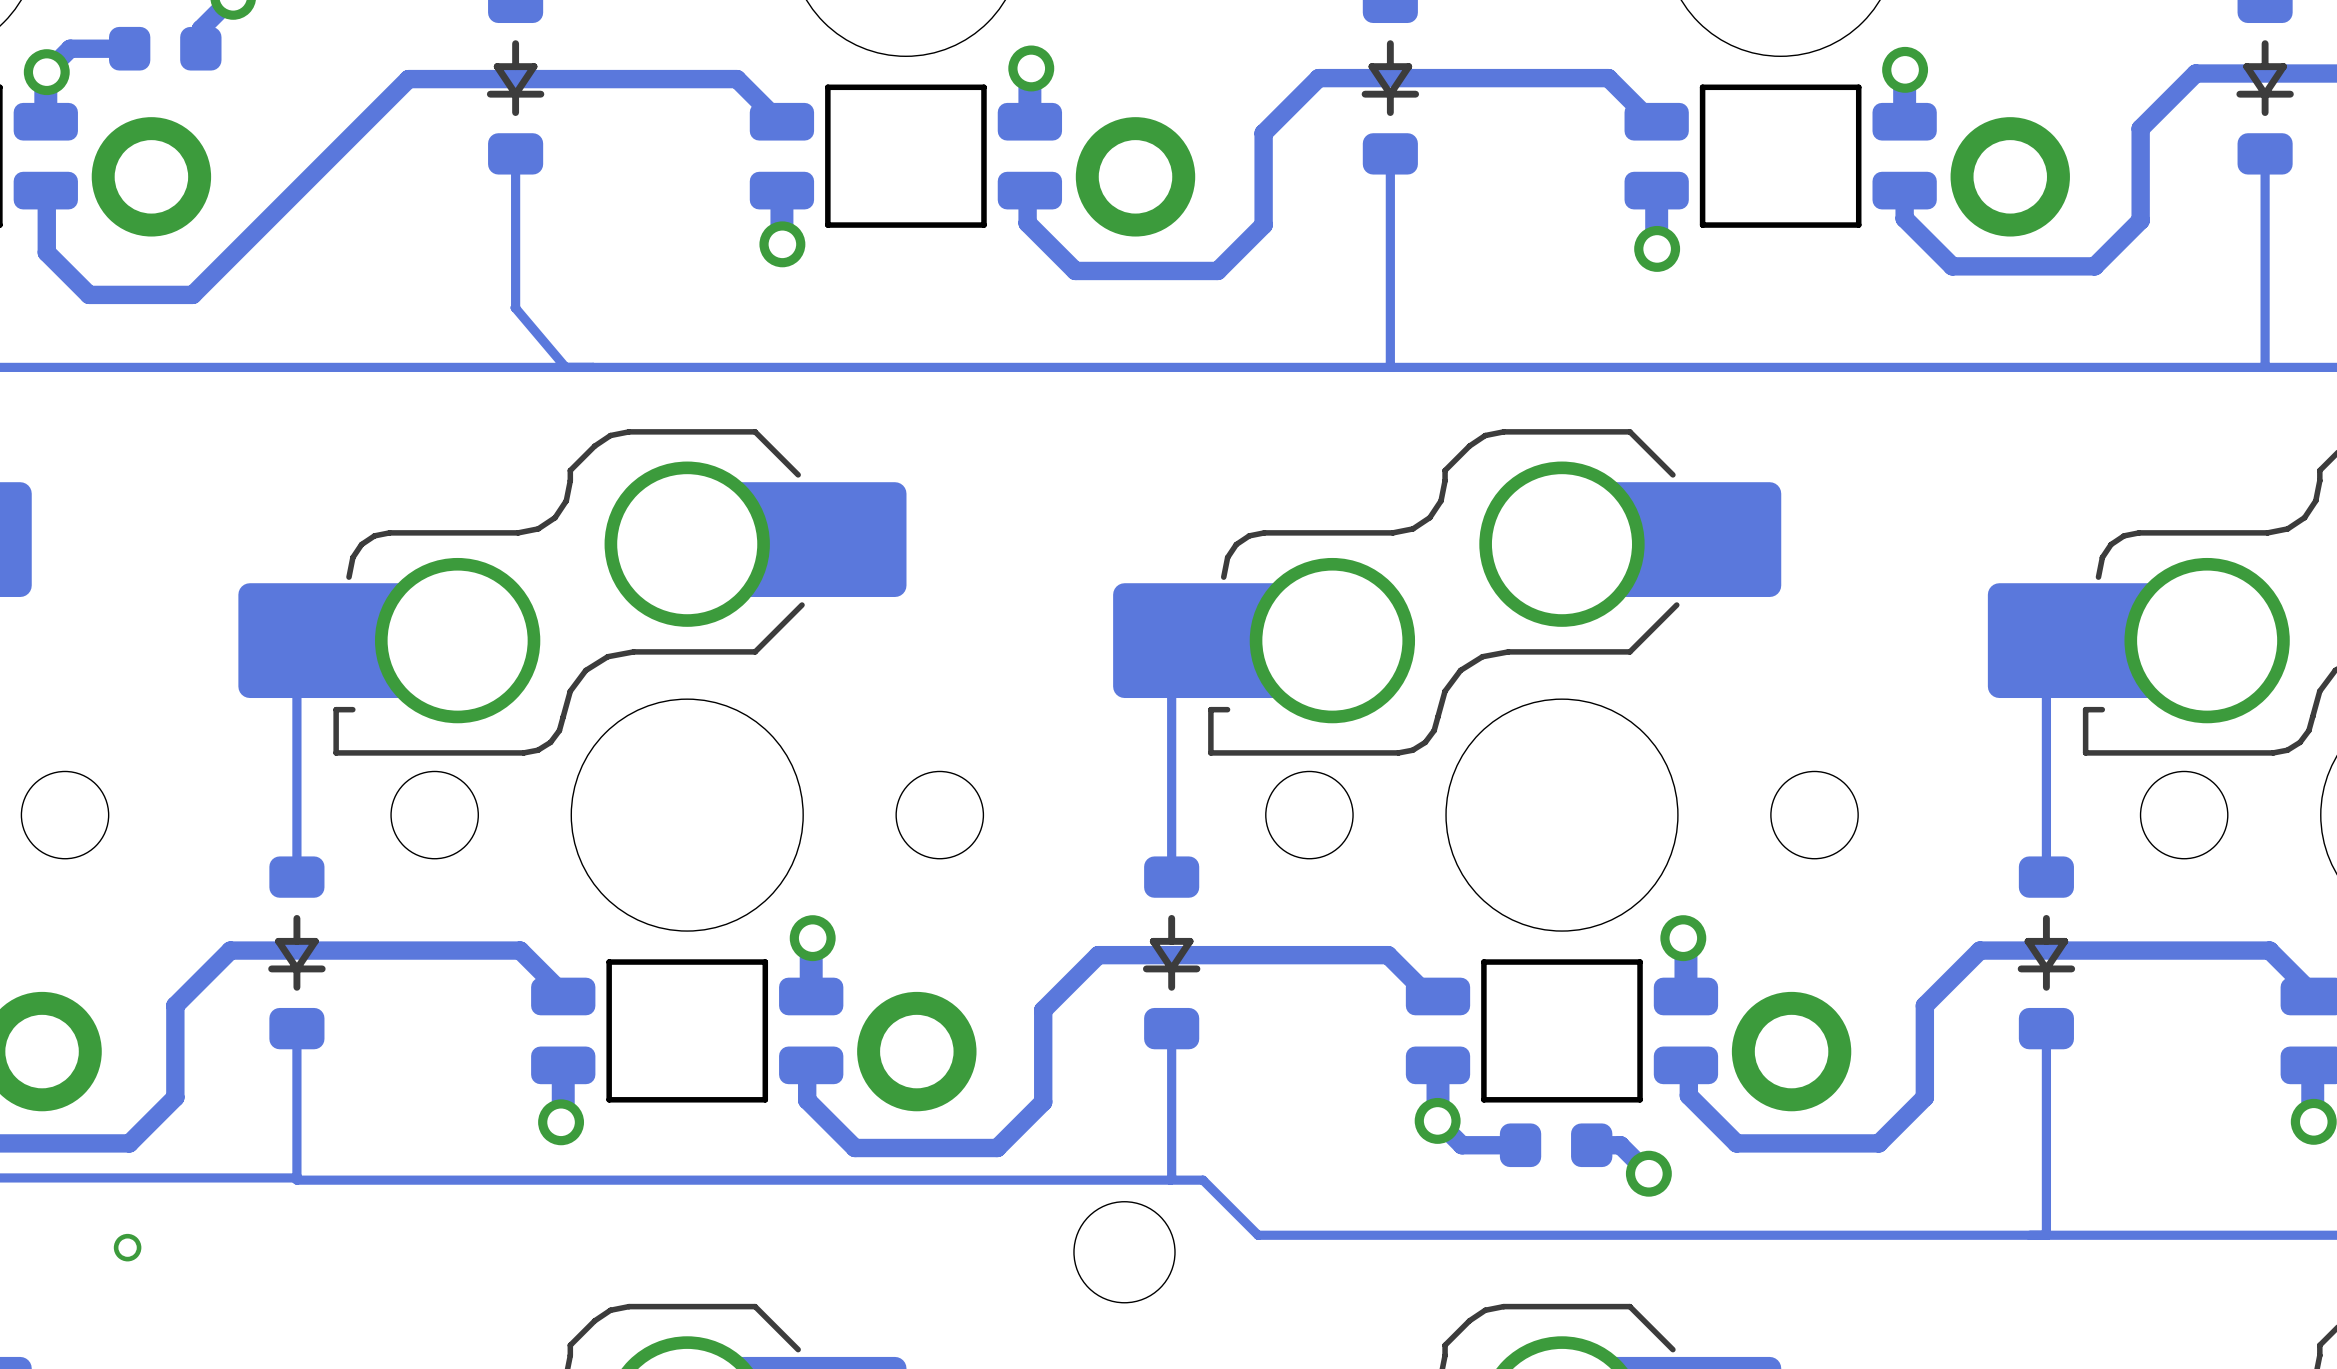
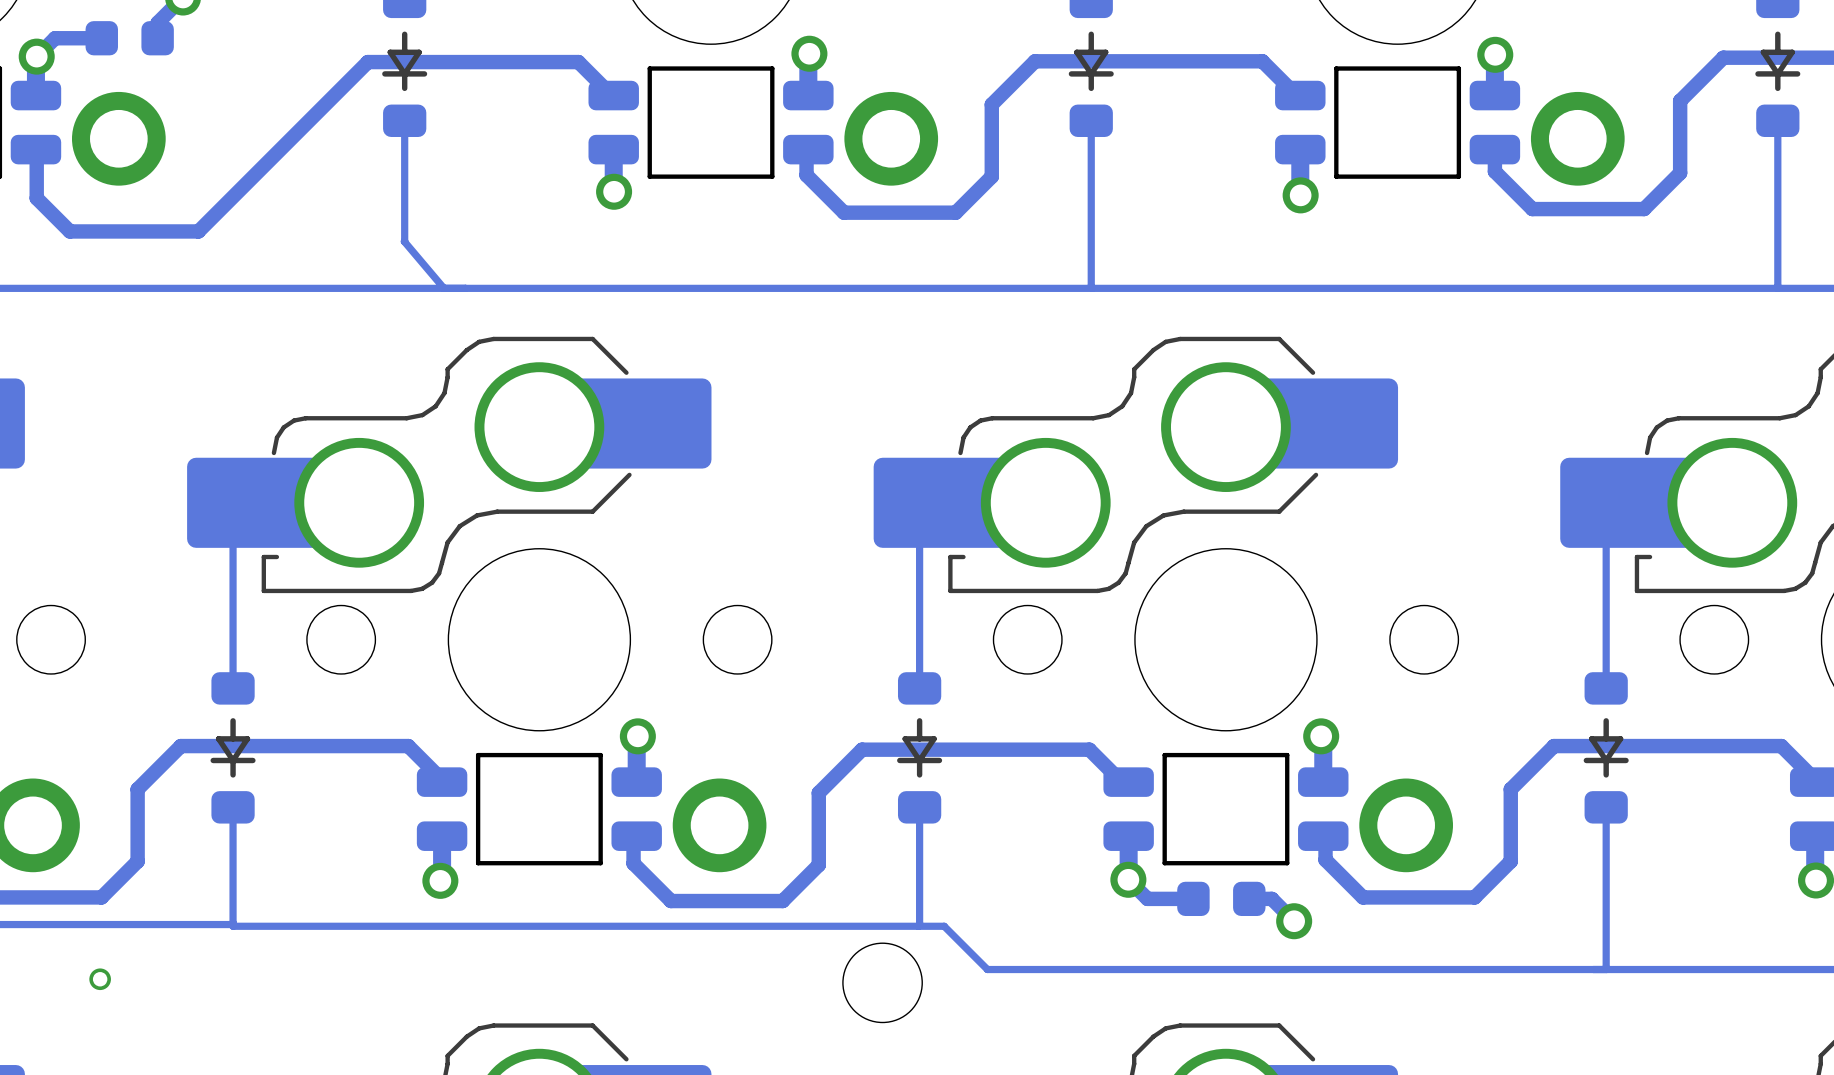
track: (468, 79) (408, 79) (192, 294) -> (367, 62) (198, 231) (151, 231)

